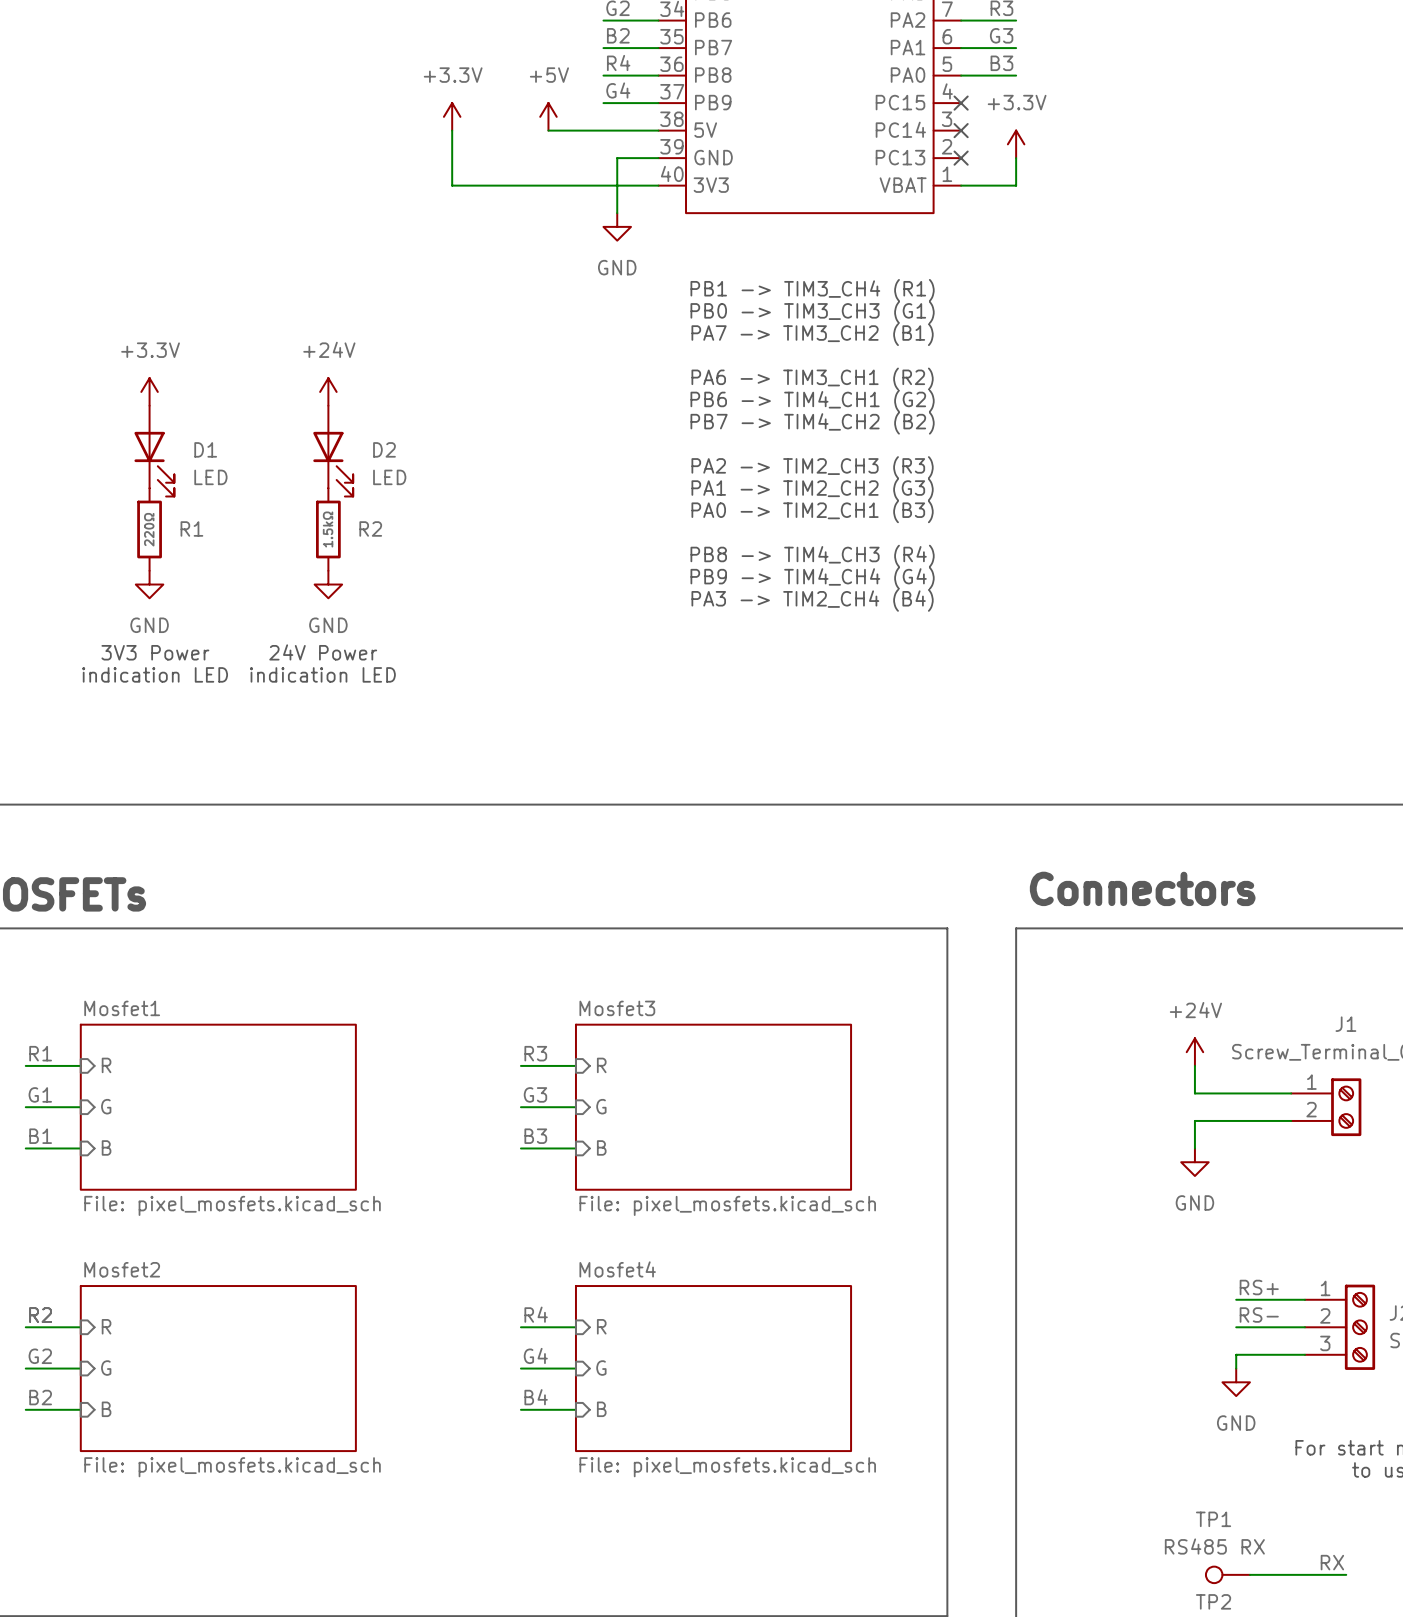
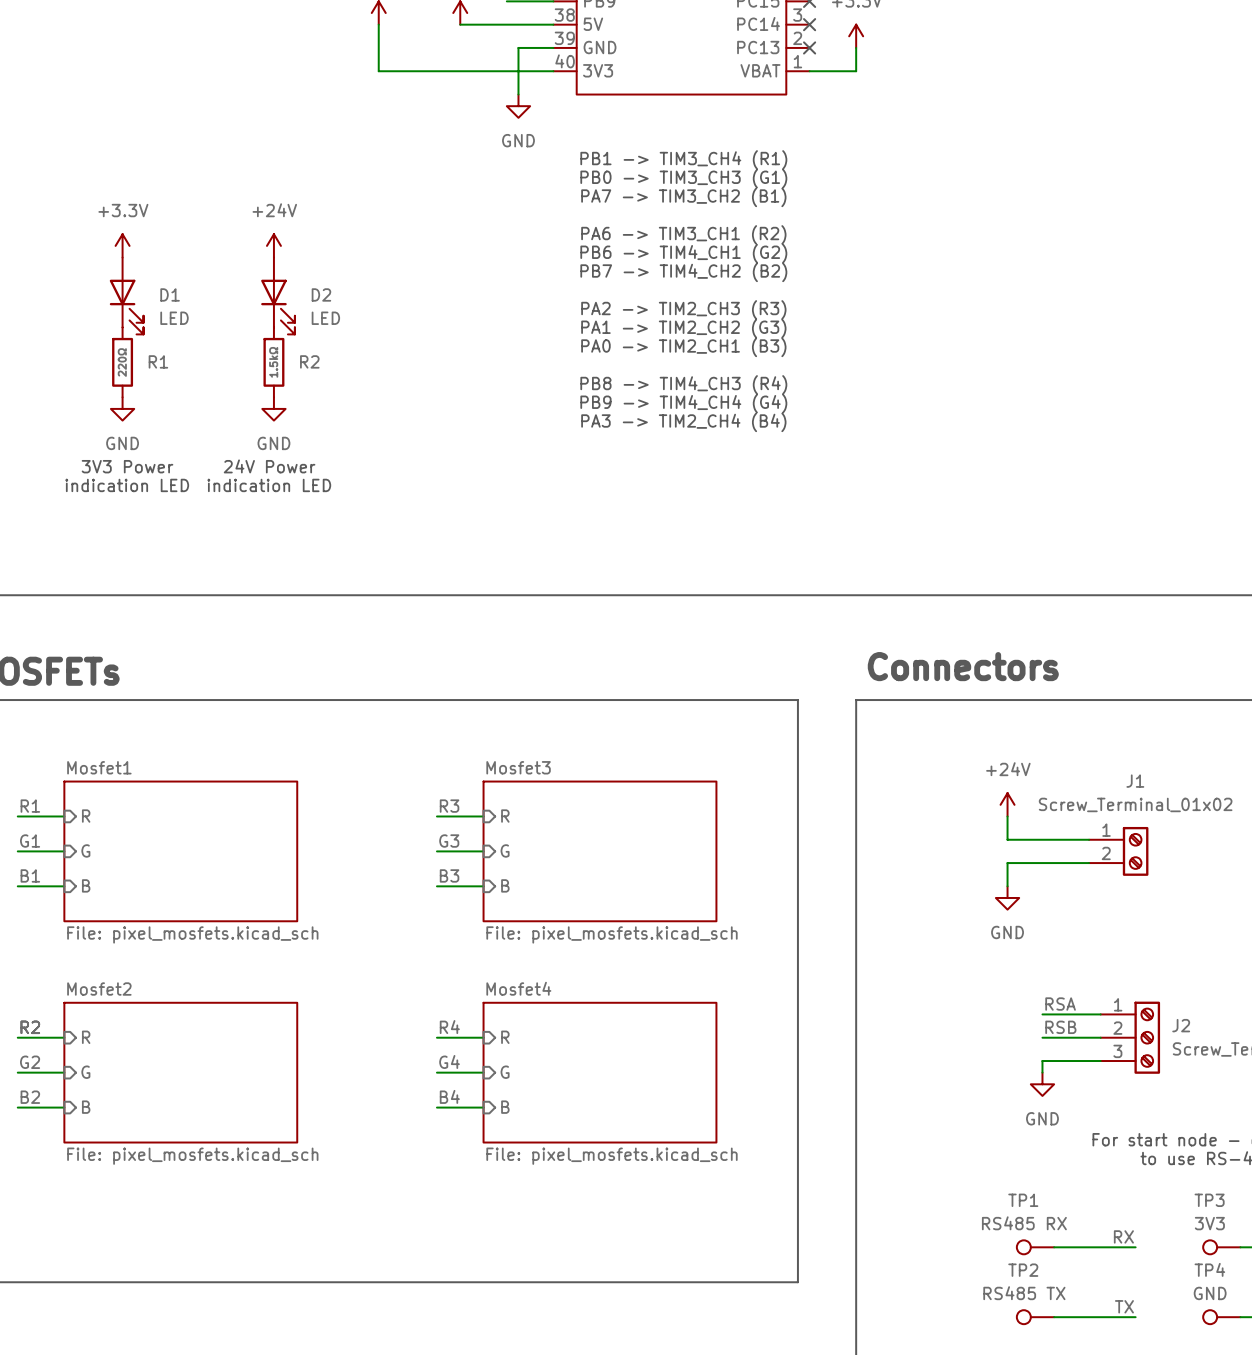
label: RS+ (1259, 1287) -> RSA (1060, 1004)
label: RS- (1259, 1315) -> RSB (1060, 1027)

